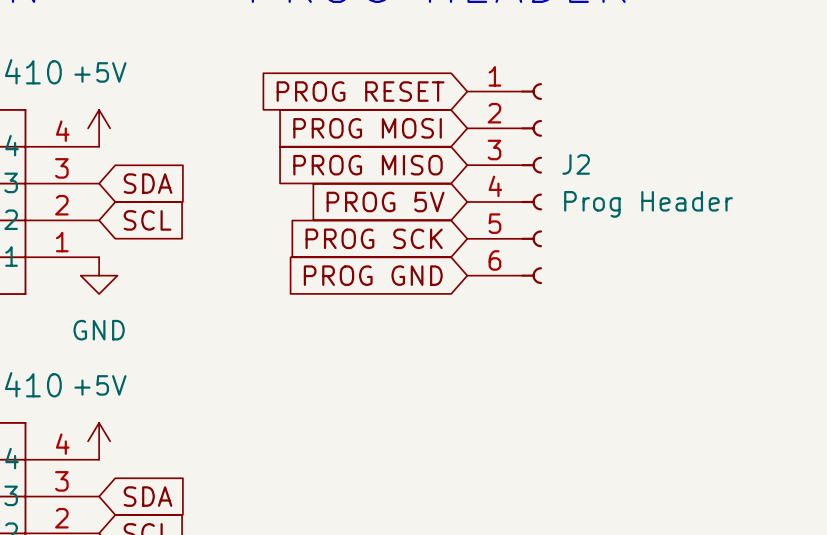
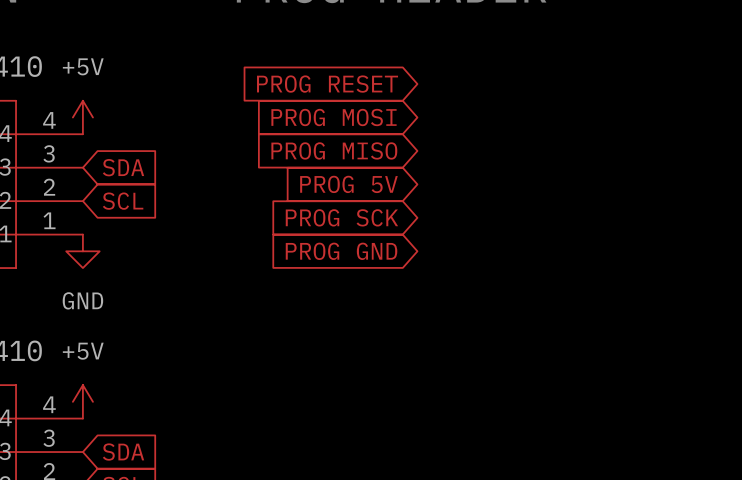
J2: Prog Header (504, 183) -> none

